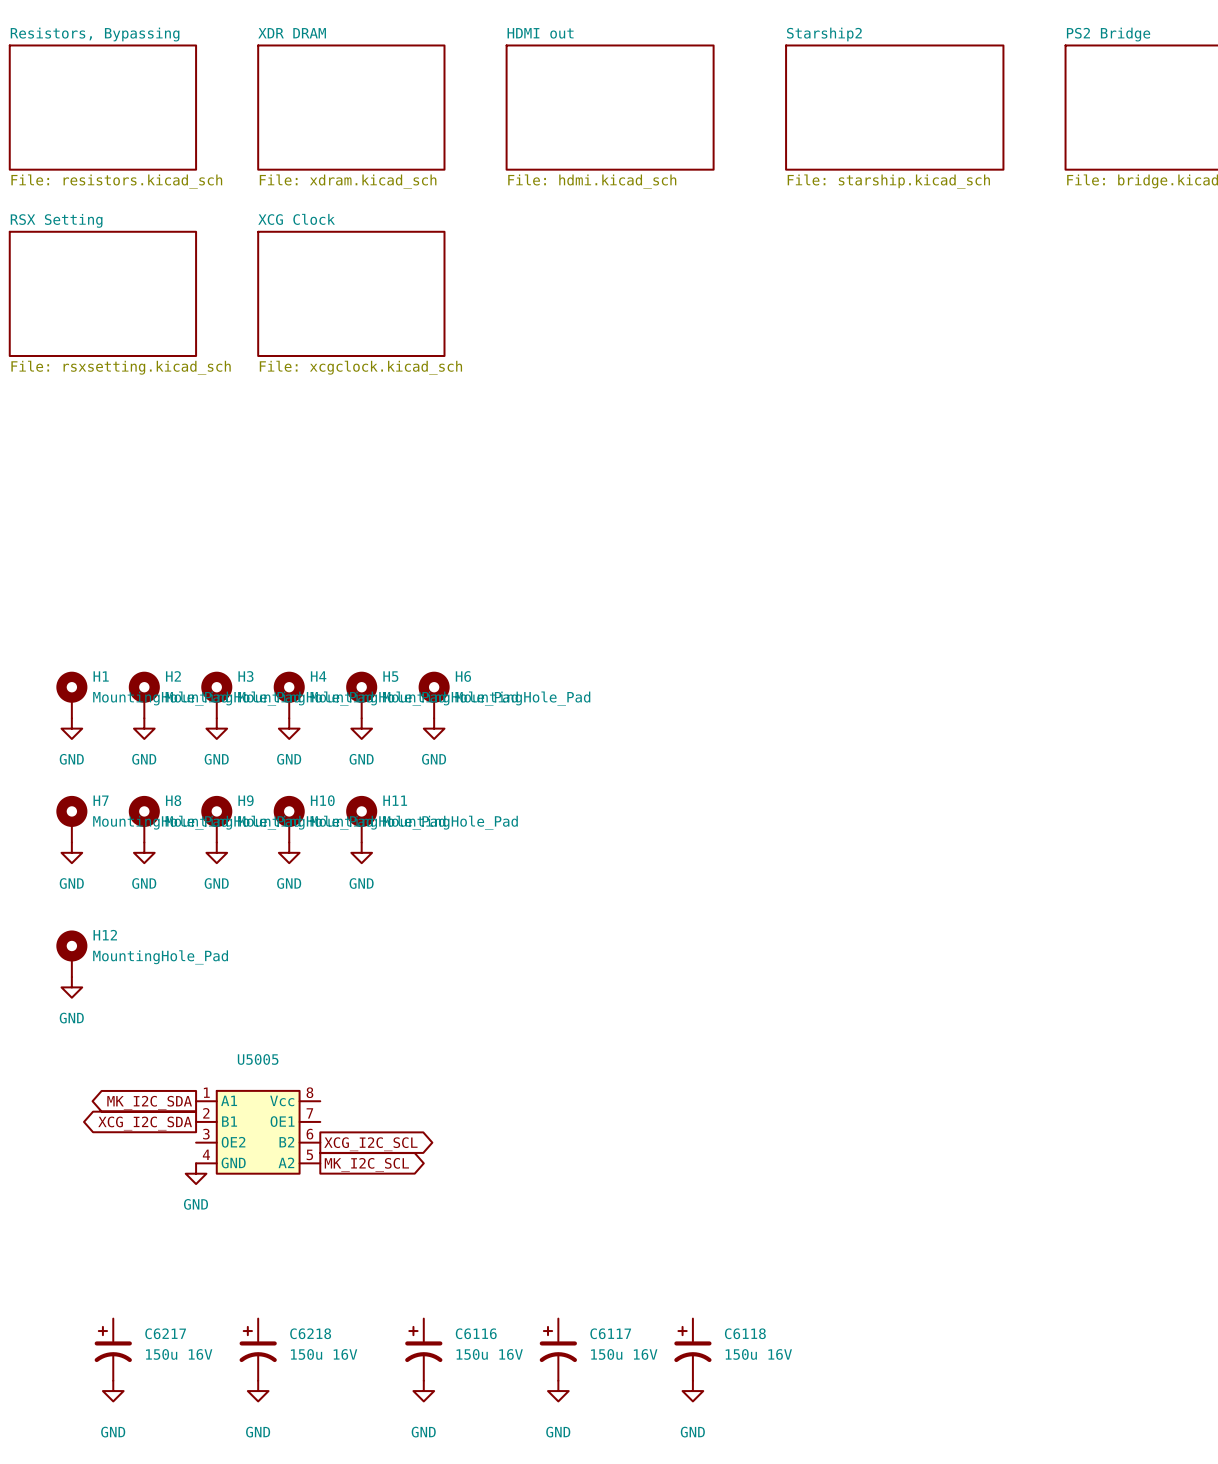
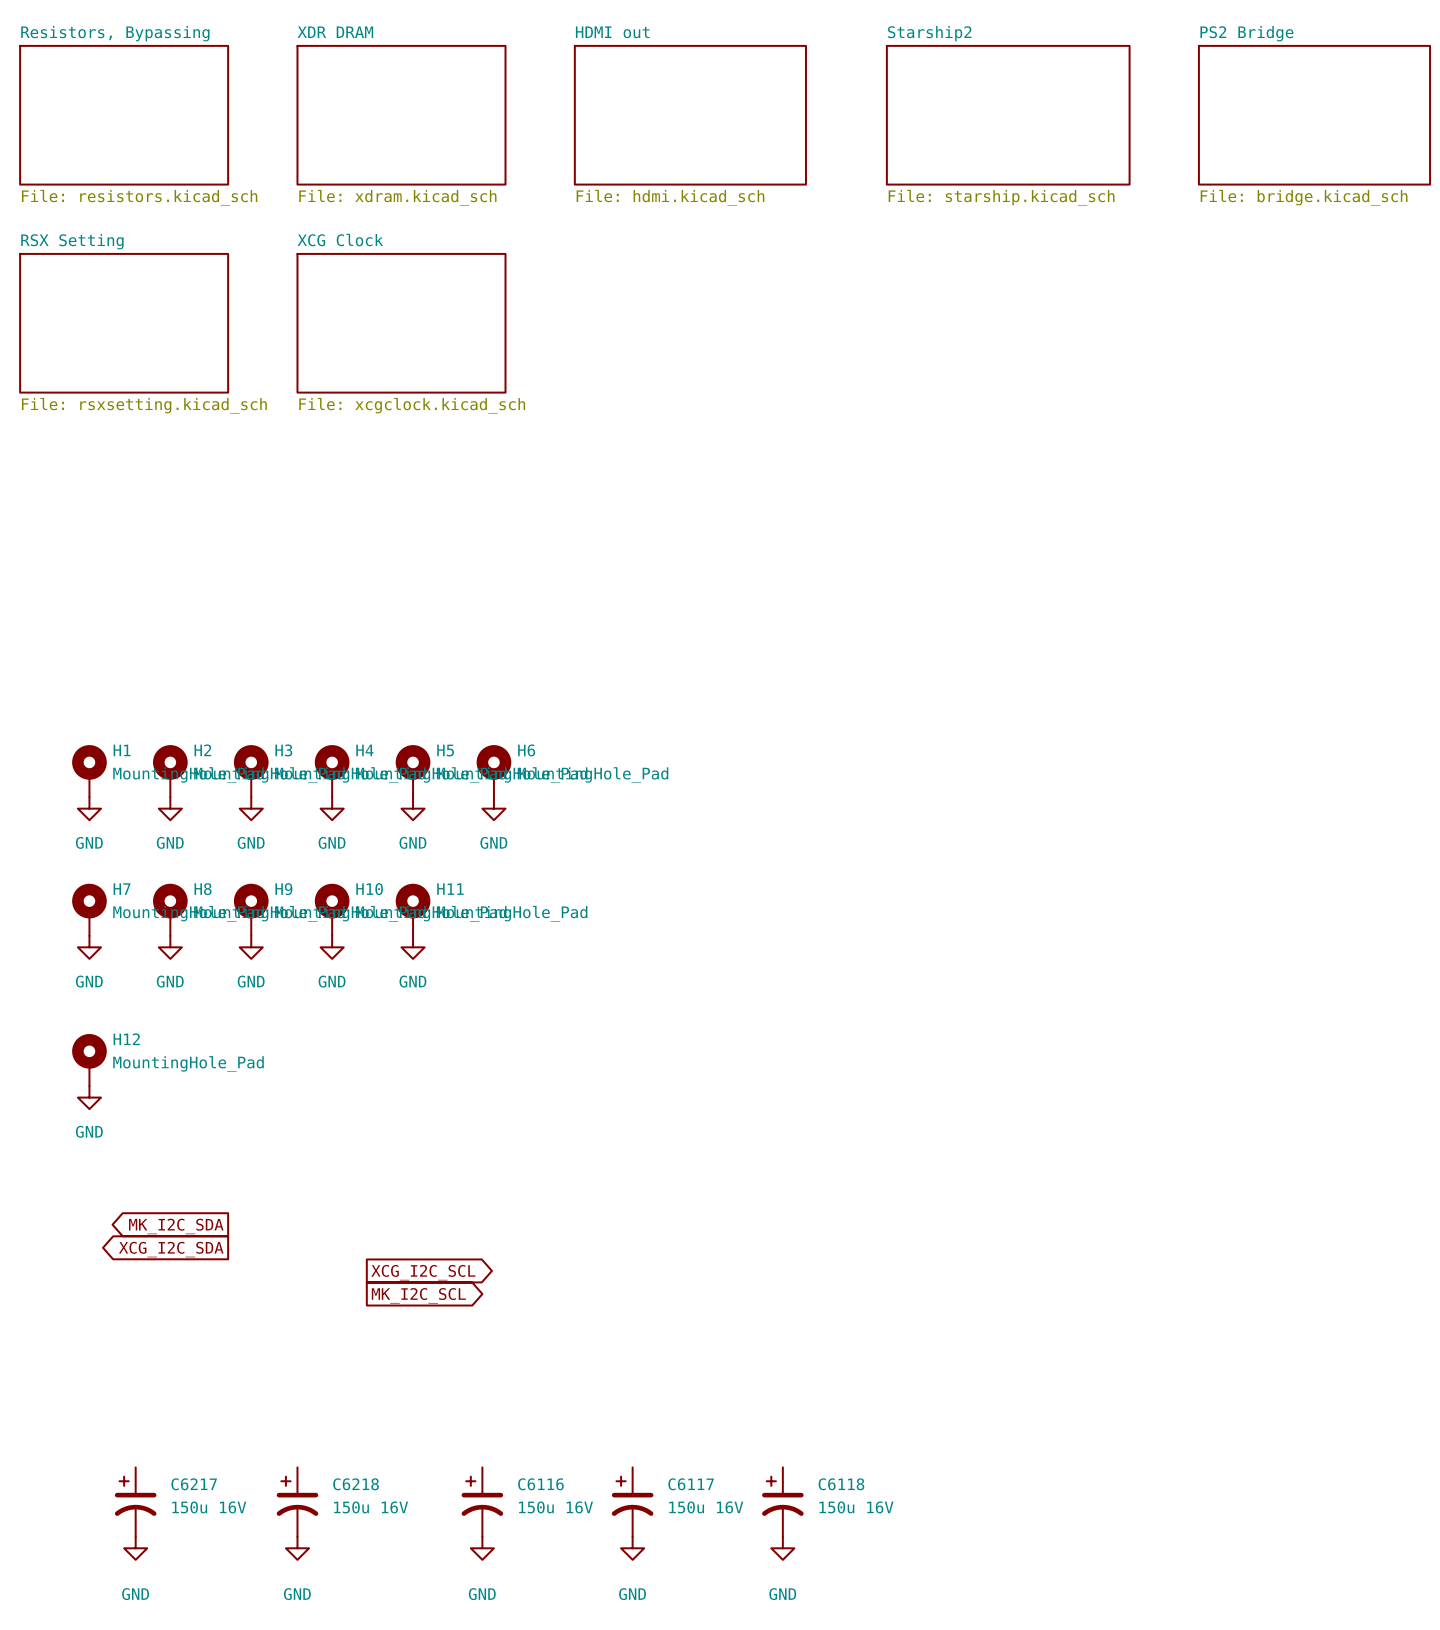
U5005: (258, 1132) -> none
power symbol: GND (196, 1173) -> none

